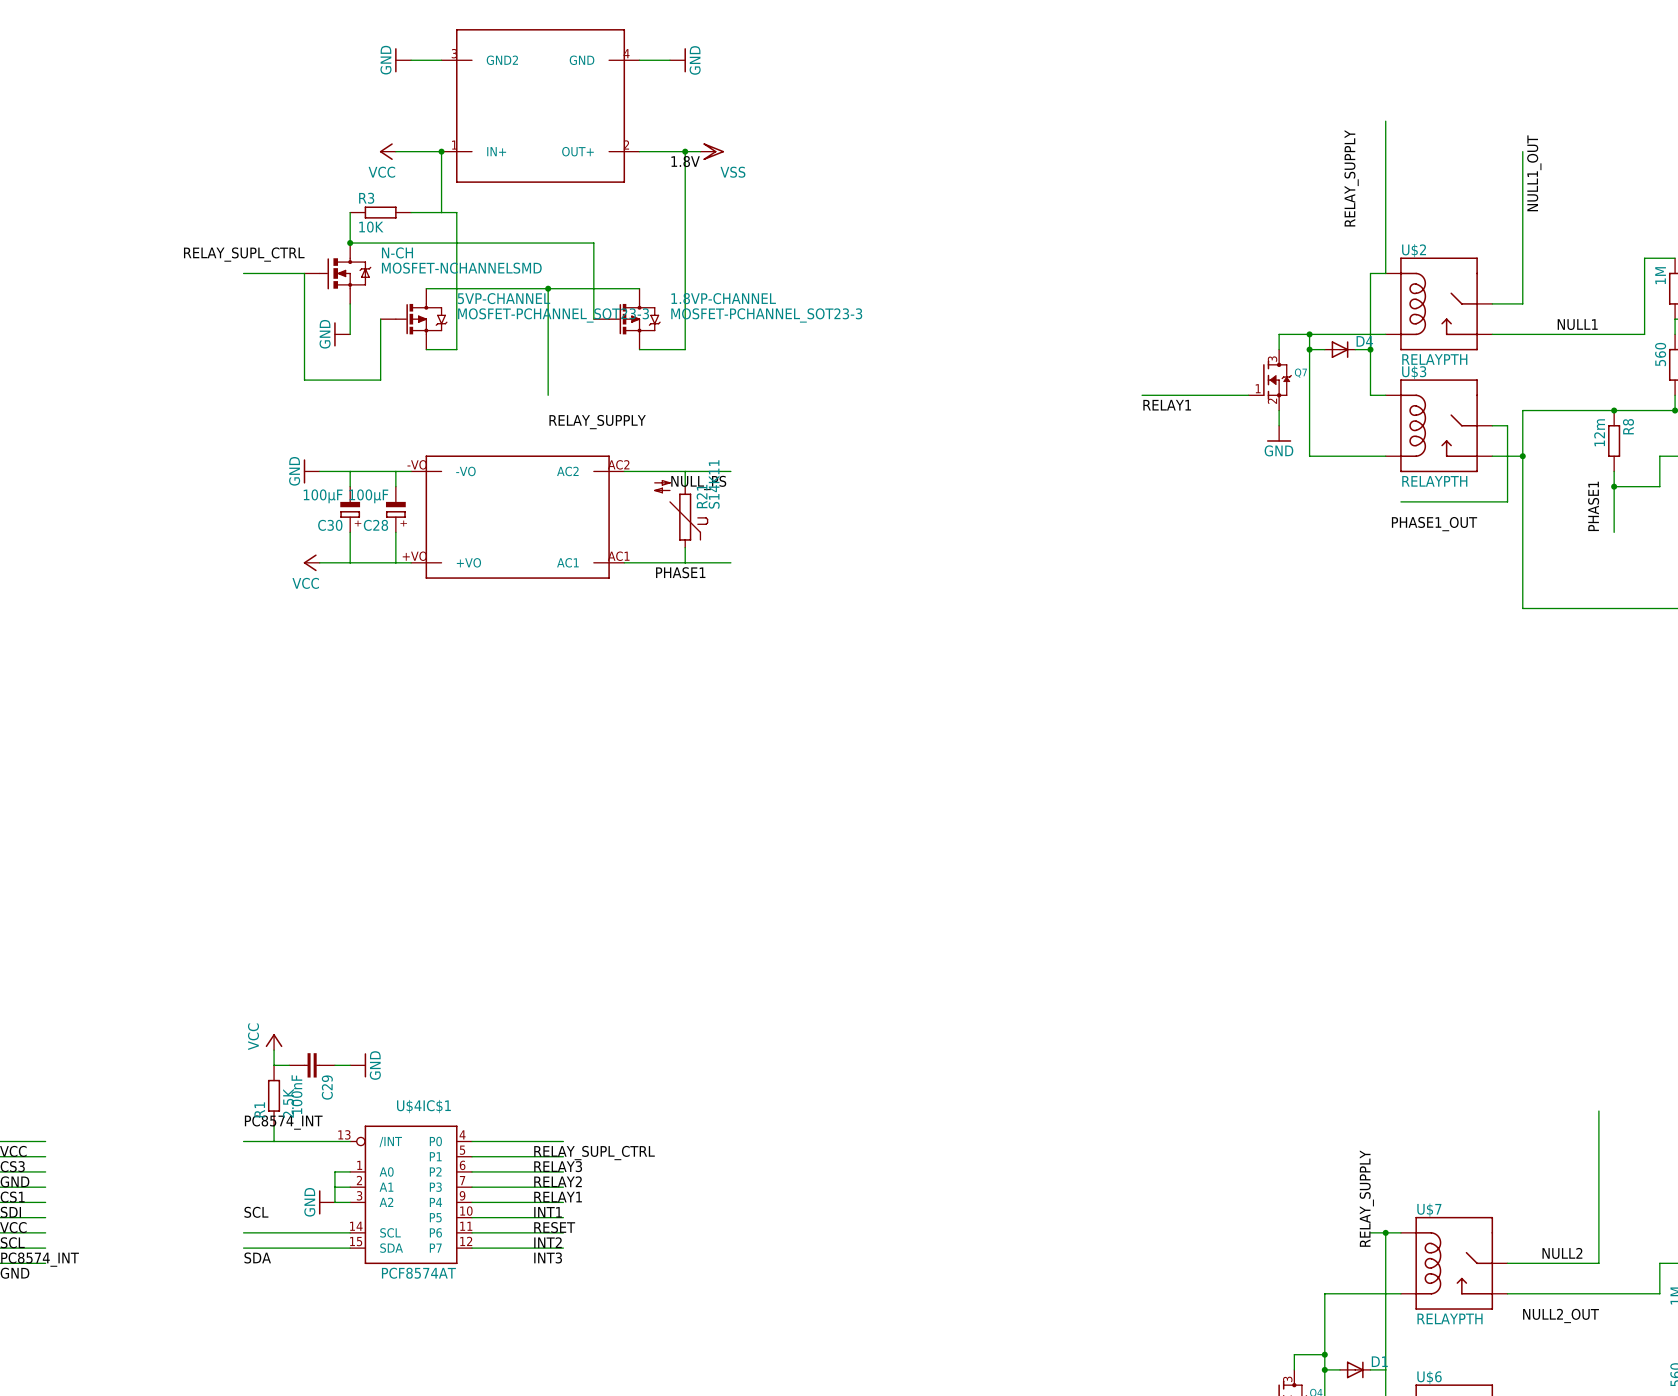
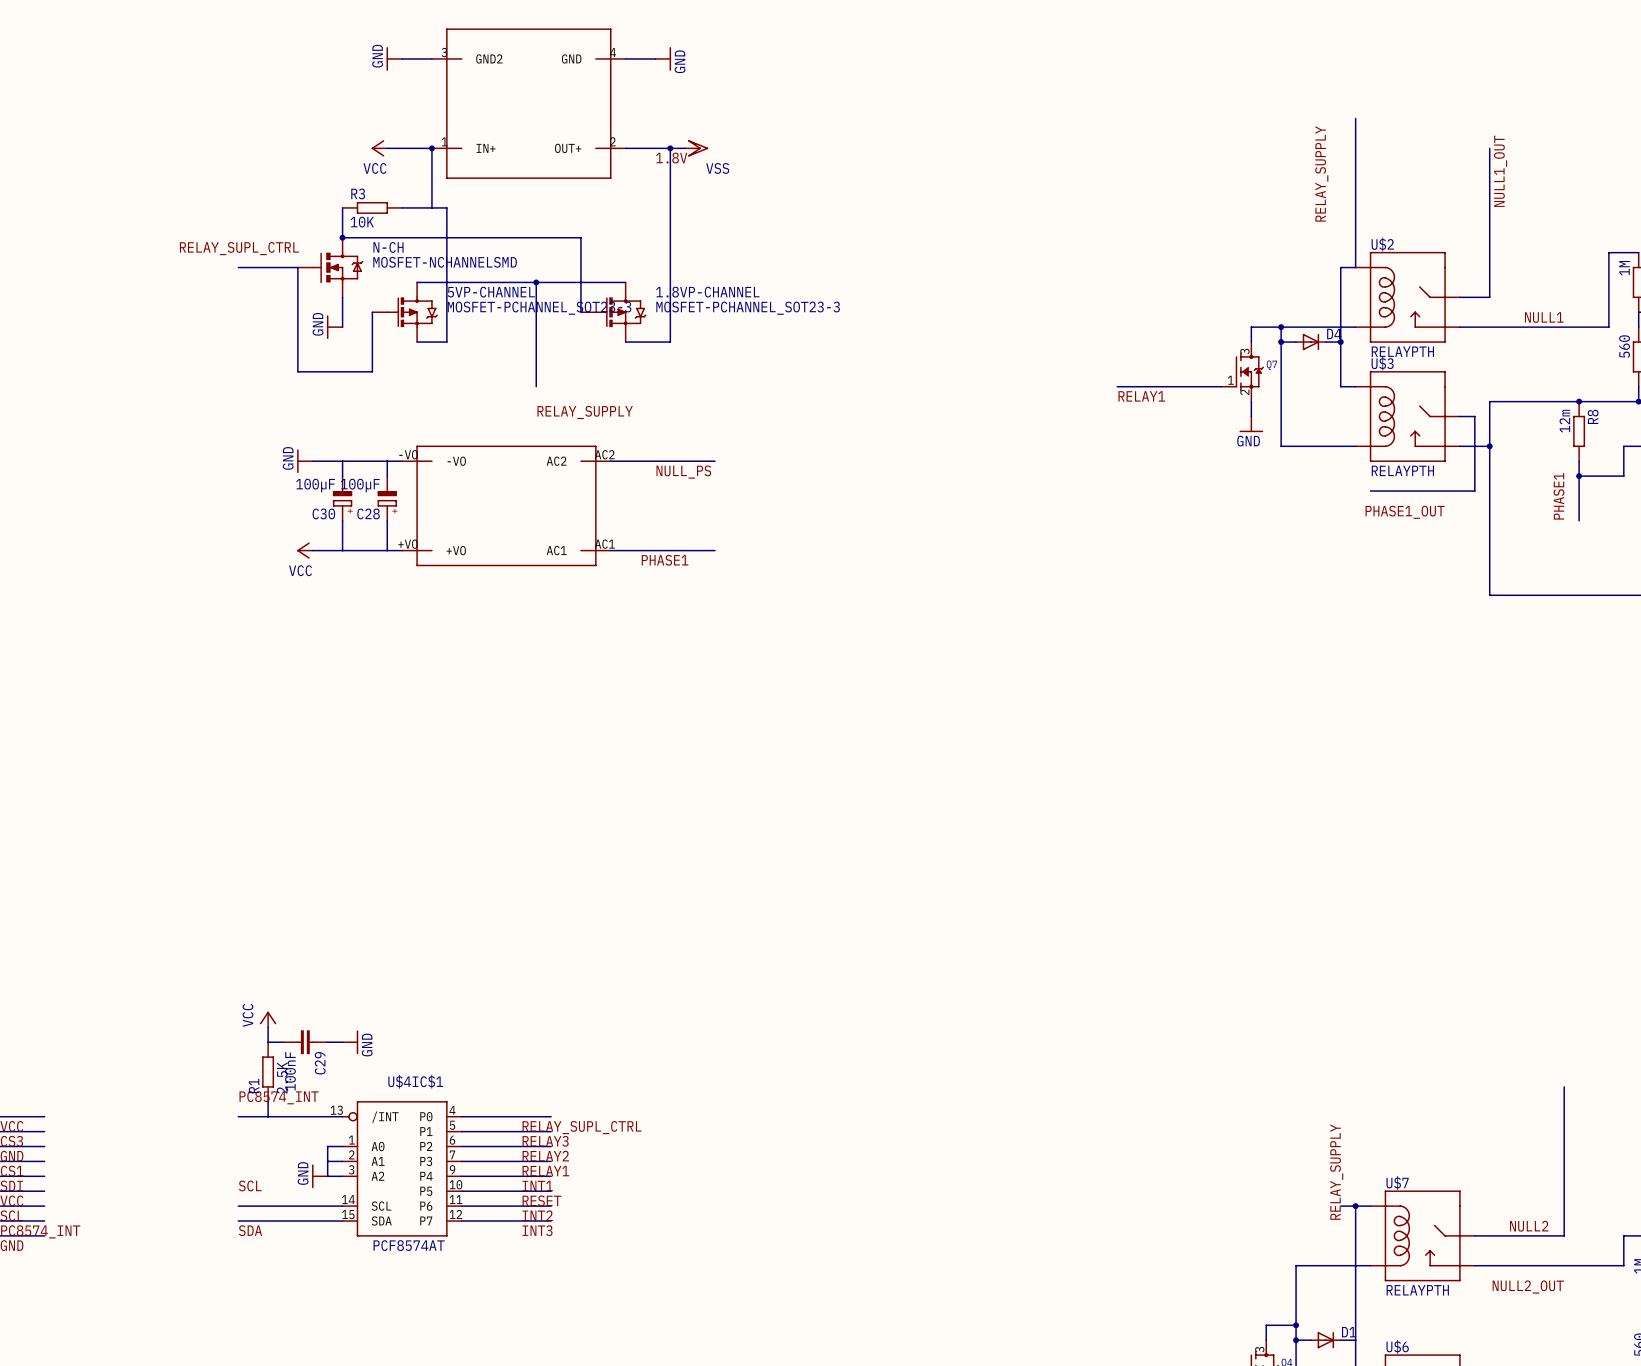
wire: (685, 471) (685, 486) -> none
R21: S14K11 (681, 514) -> none
wire: (685, 547) (685, 562) -> none

